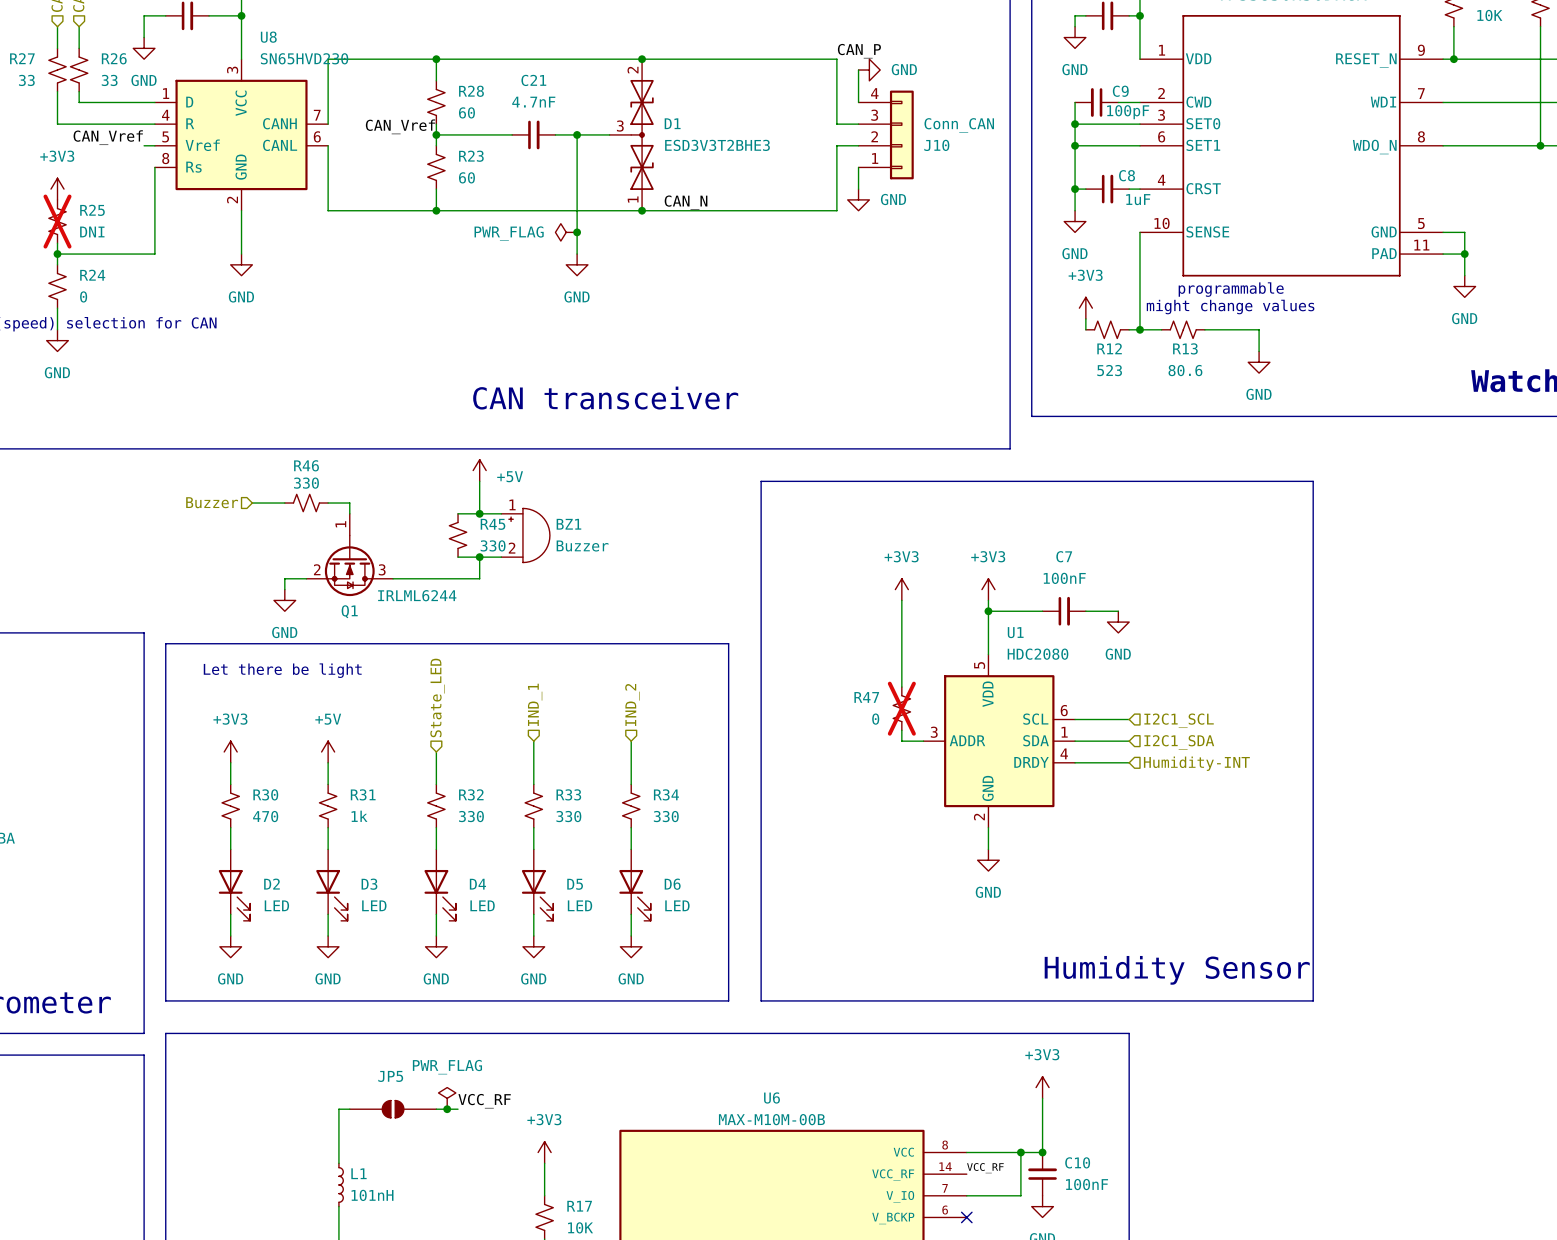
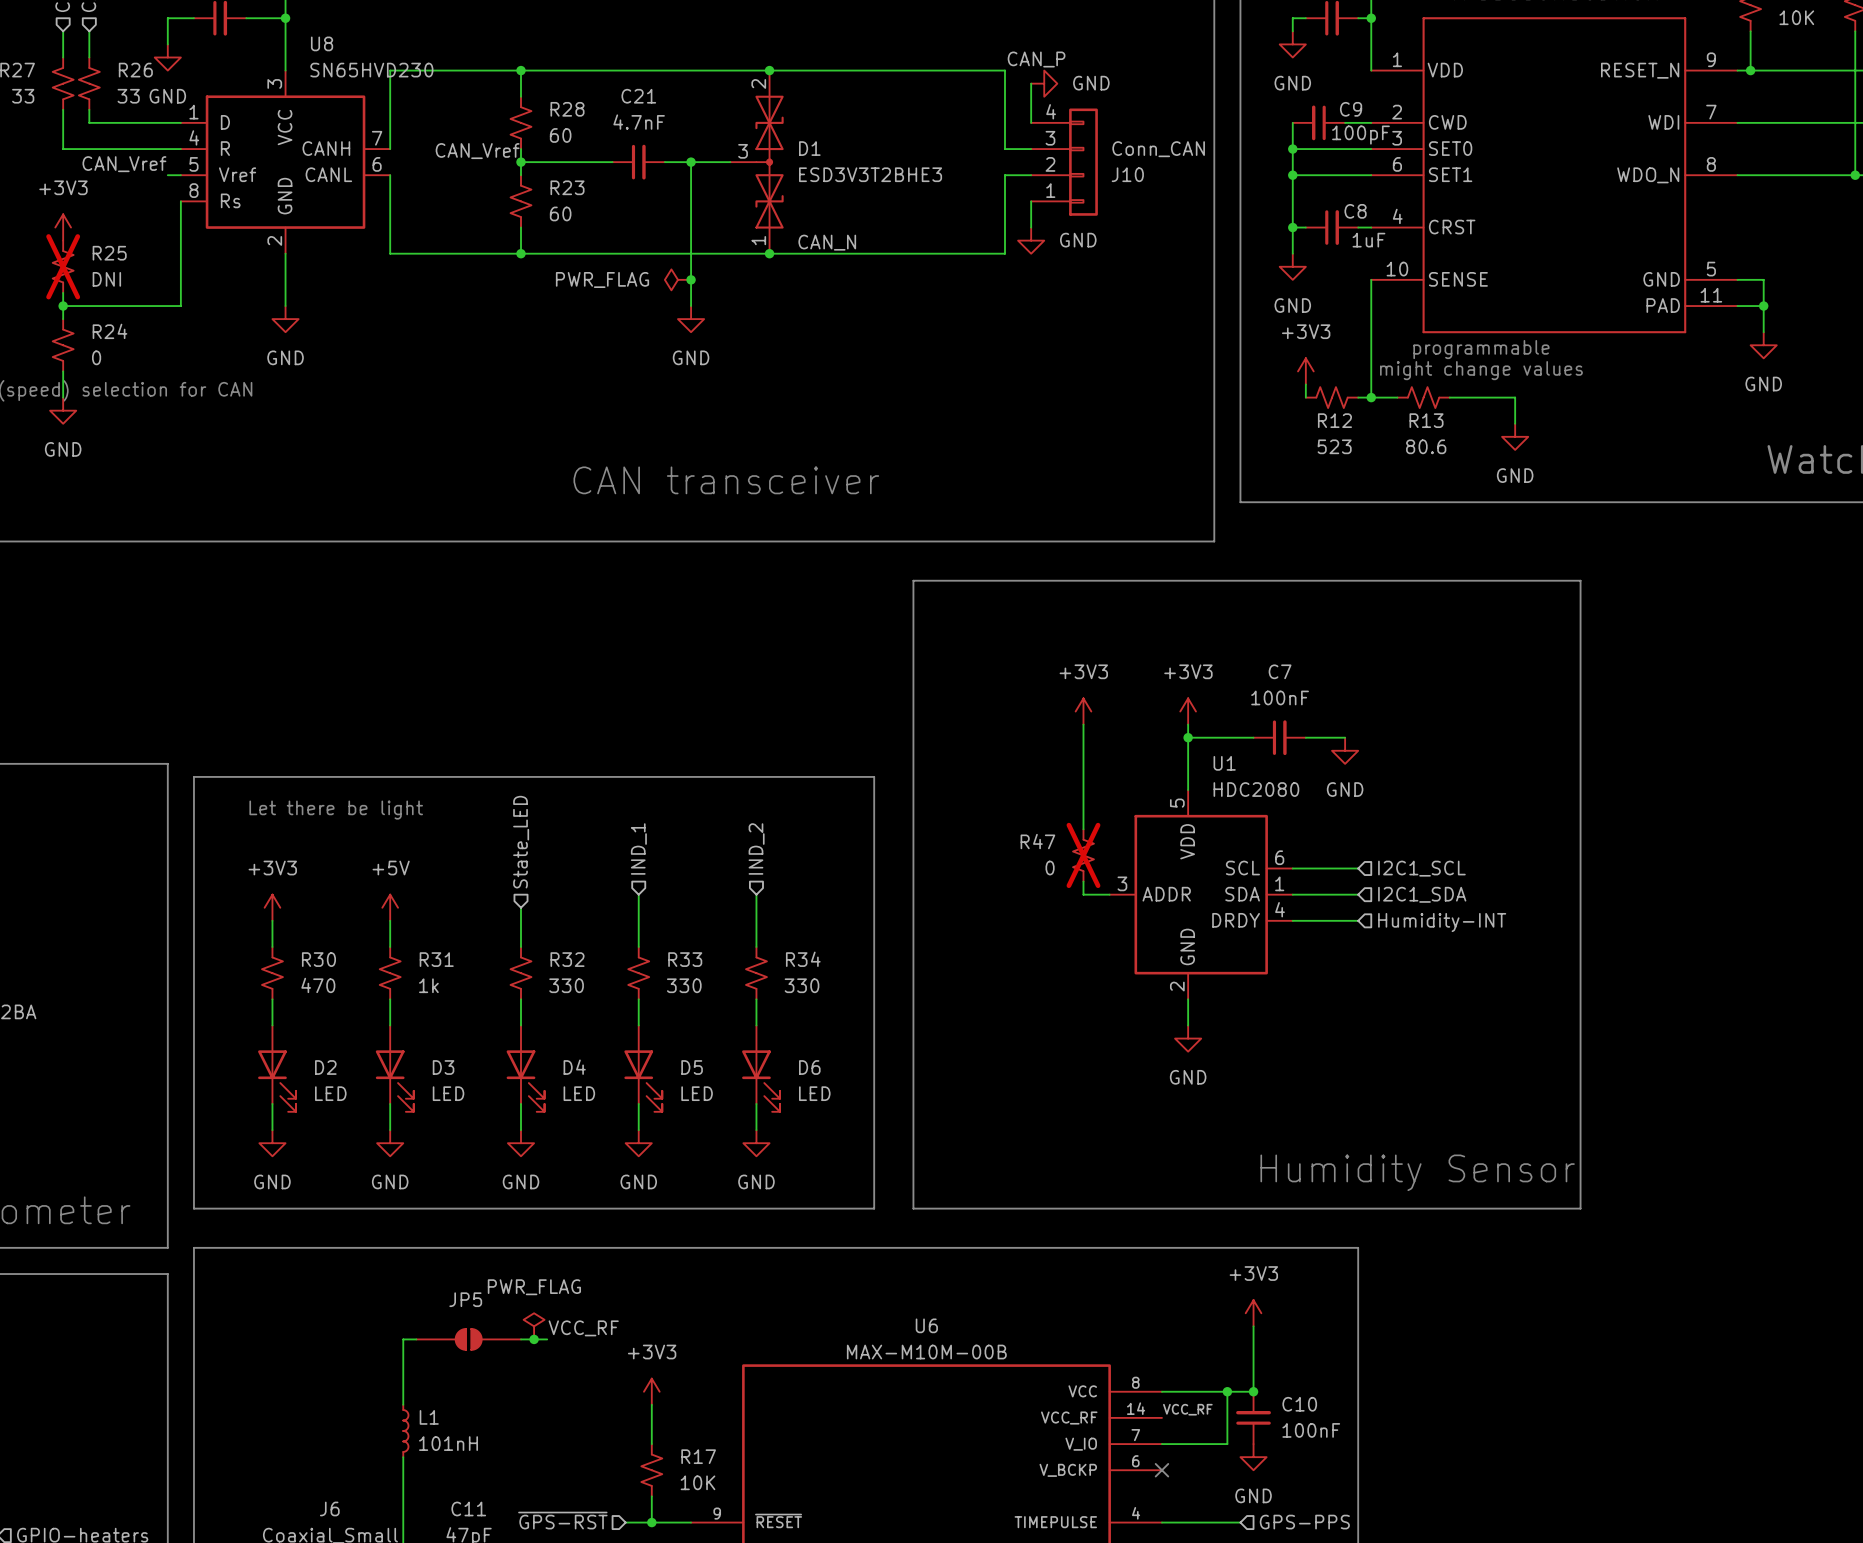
power symbol: +5V (479, 470) -> none
wire: (479, 481) (479, 513) -> none
hierarchical label: Buzzer (212, 502) -> none
wire: (252, 503) (284, 503) -> none
R46: 330 (306, 503) -> none
wire: (328, 503) (349, 503) (349, 513) -> none
wire: (458, 513) (501, 513) -> none
junction: (479, 513) -> none
R45: 330 (458, 535) -> none
BZ1: Buzzer (525, 535) -> none
Q1: IRLML6244 (349, 554) -> none
wire: (458, 557) (501, 557) -> none
wire: (479, 557) (479, 578) (393, 578) -> none
junction: (479, 557) -> none
wire: (306, 578) (284, 578) (284, 589) -> none
power symbol: GND (284, 600) -> none

